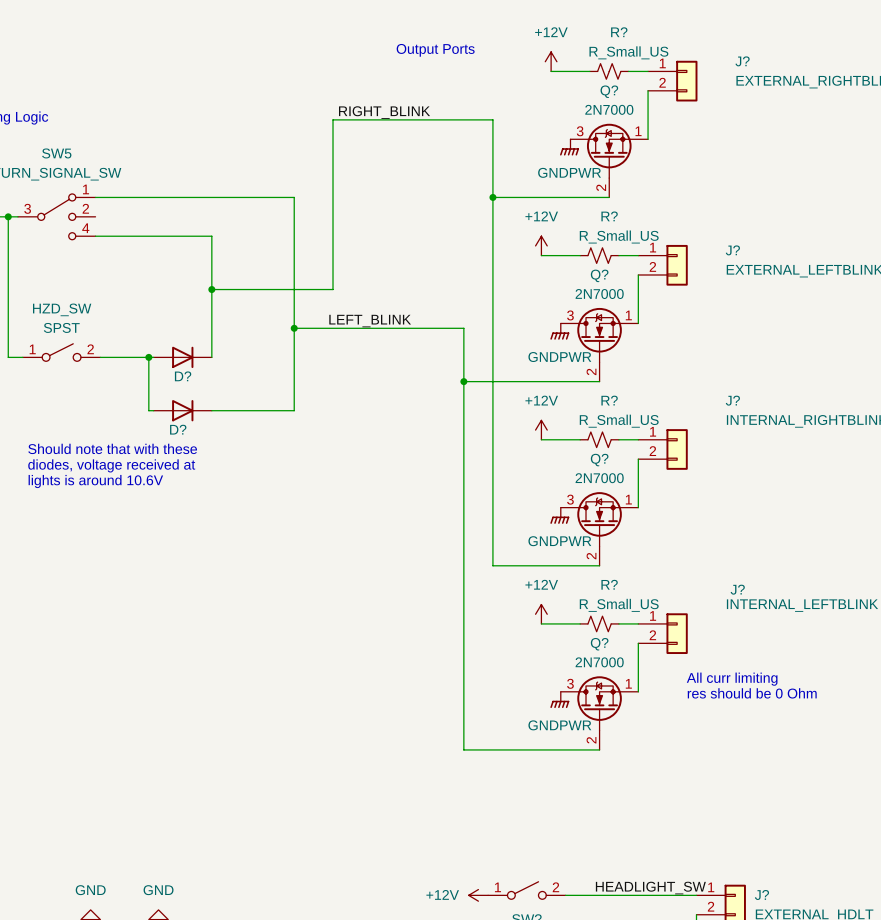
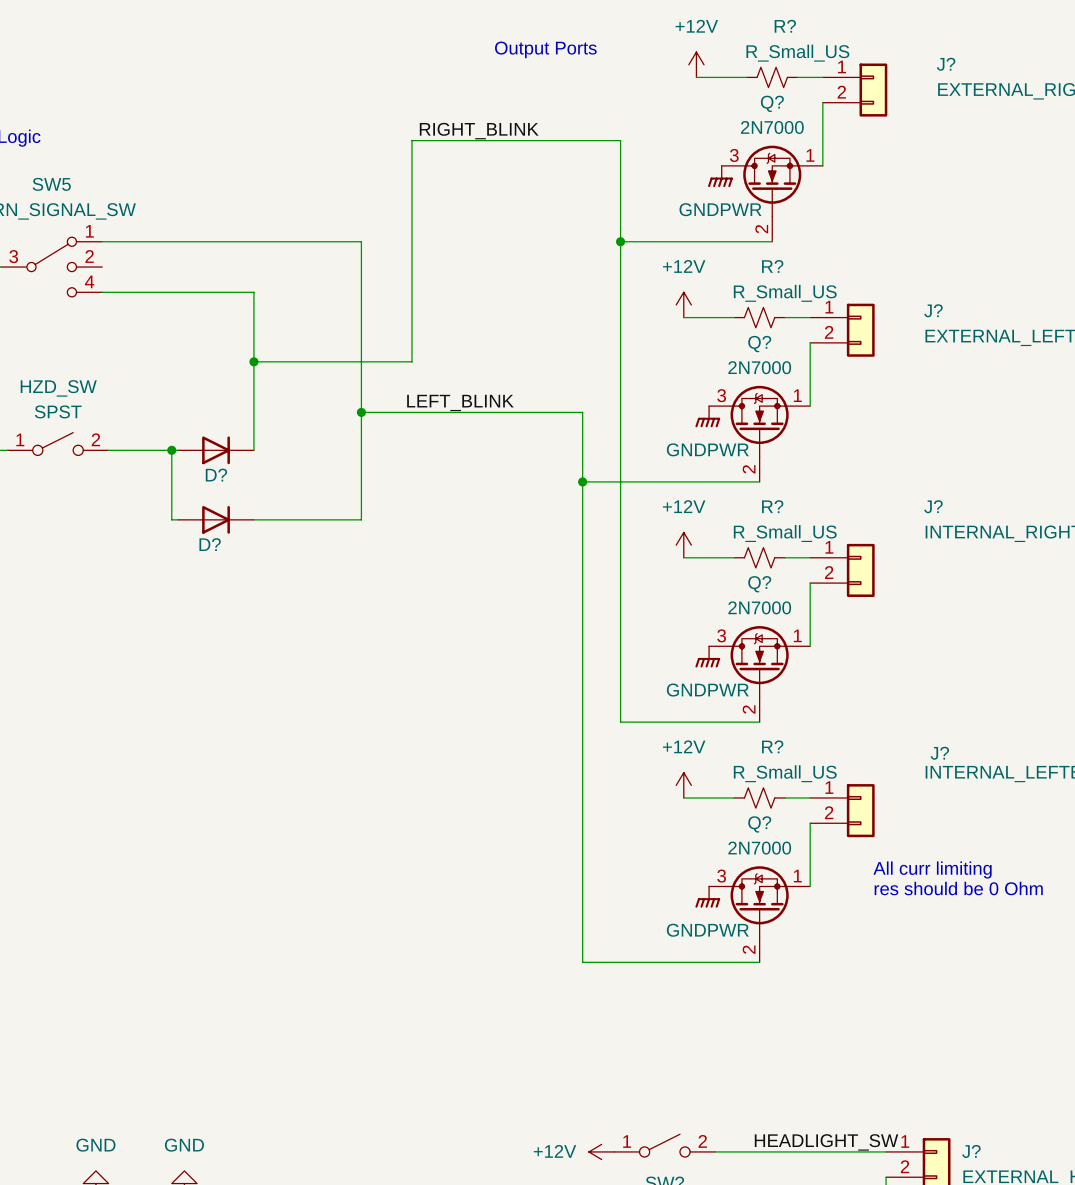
text: Should note that with these (112, 448) -> none
text: diodes, voltage received at (111, 465) -> none
text: lights is around 10.6V (95, 481) -> none

